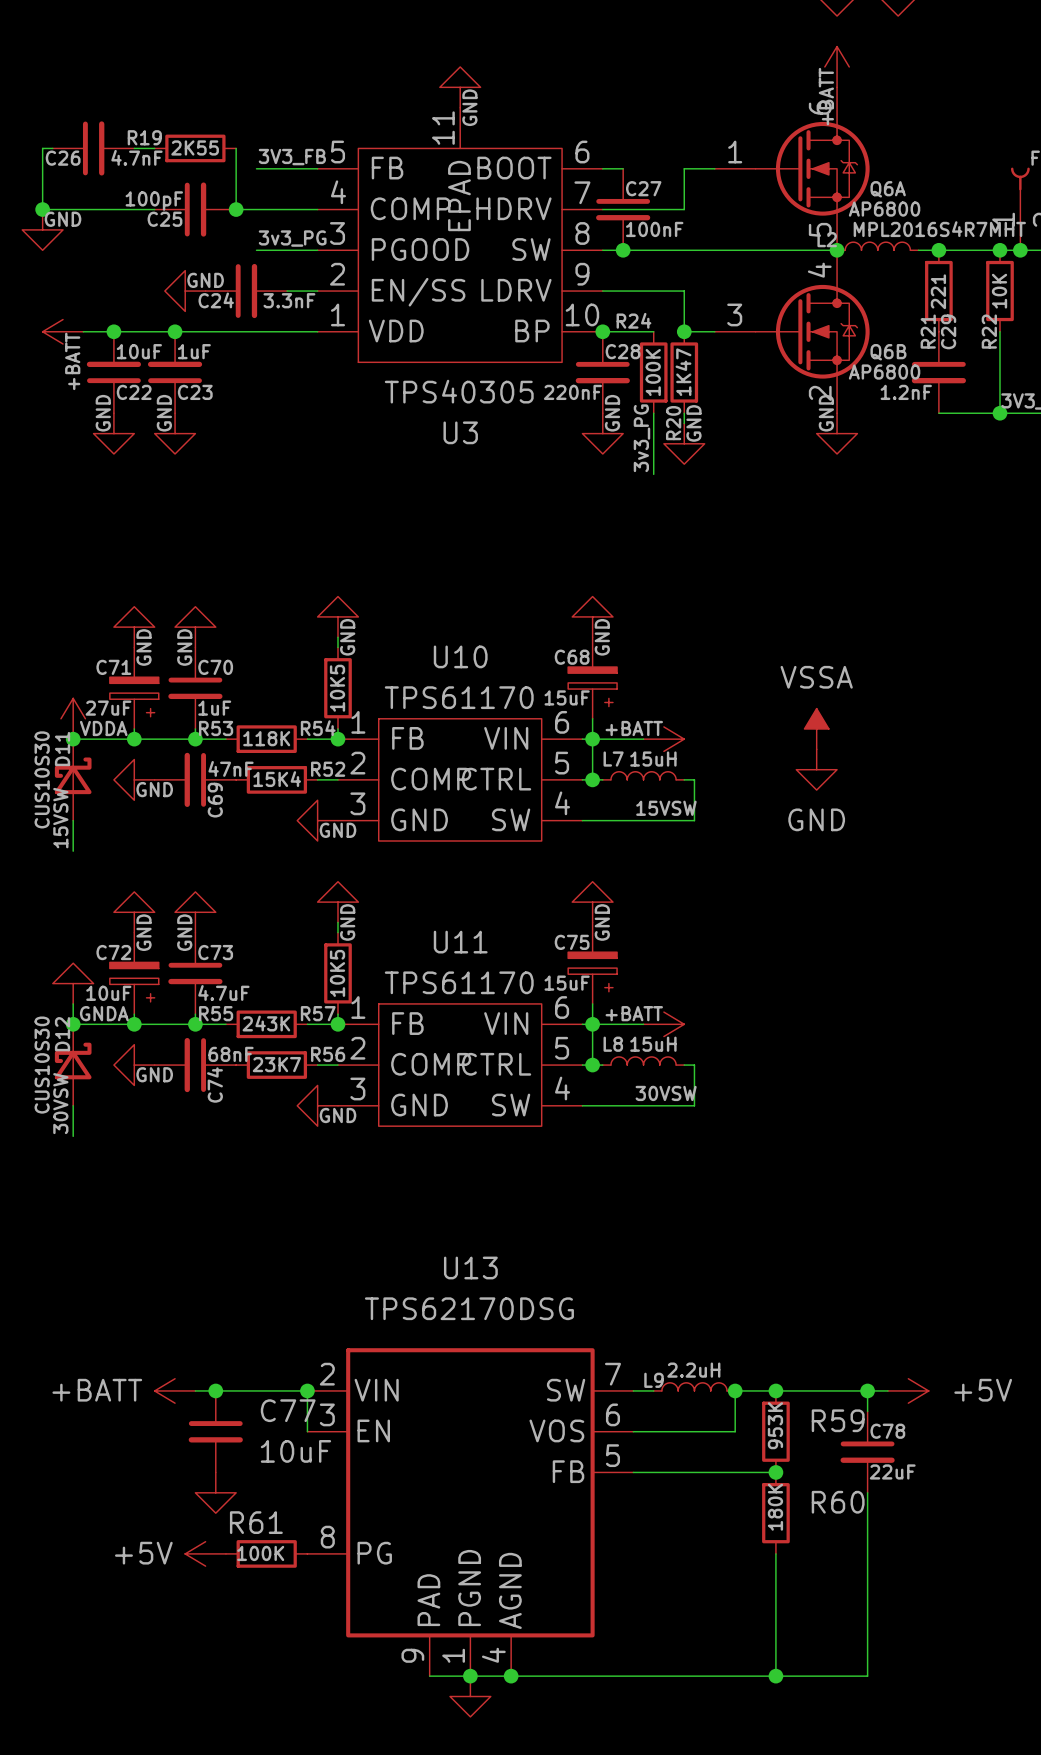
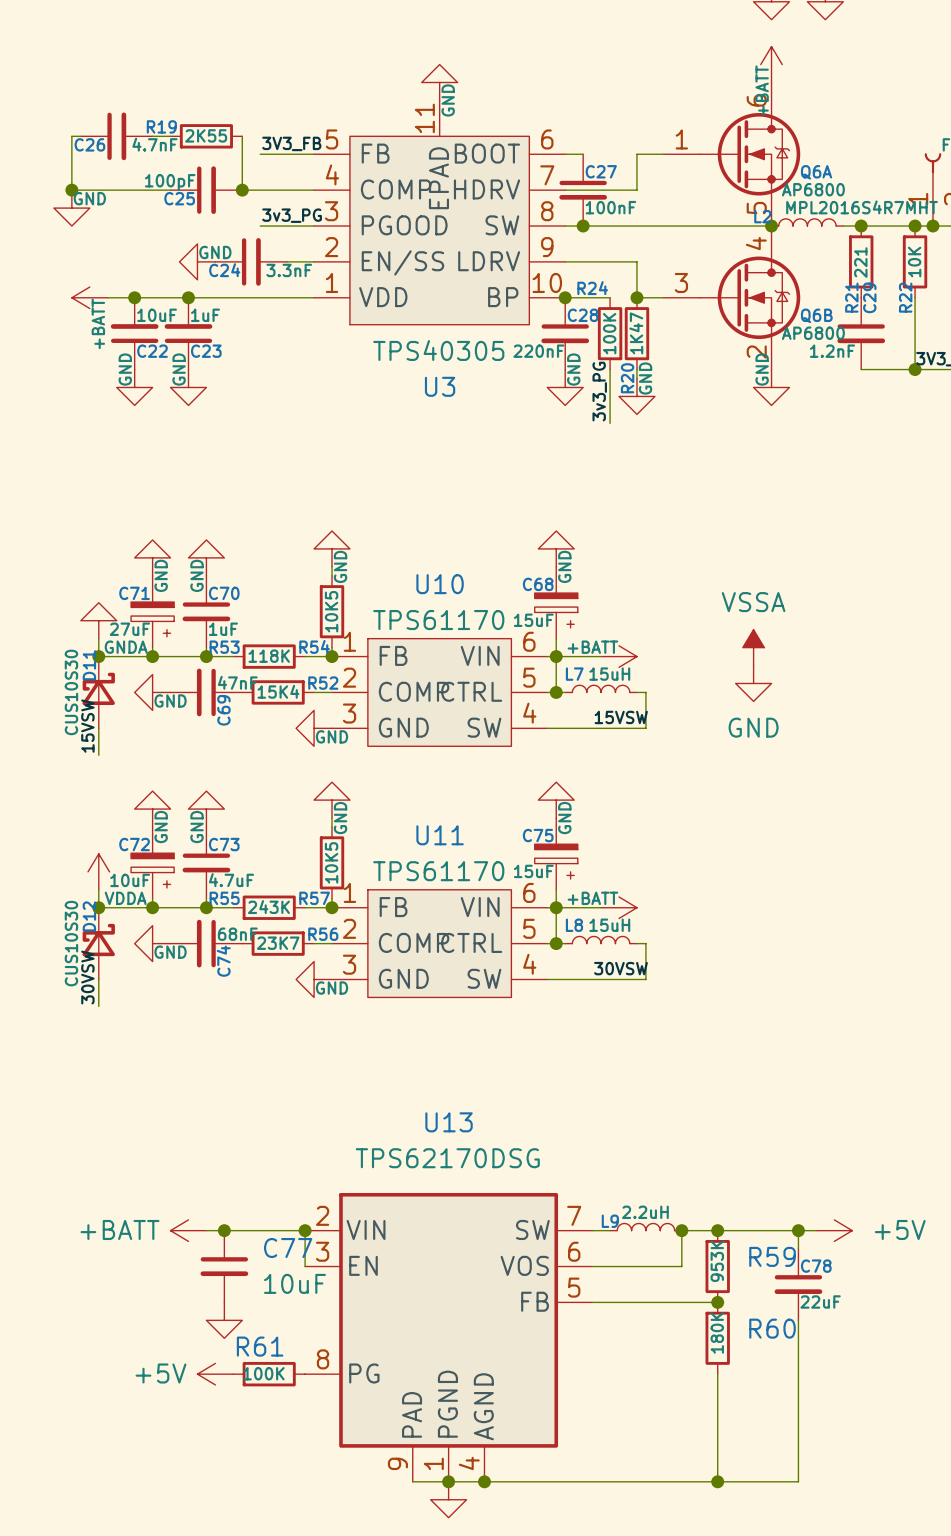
power symbol: none -> GNDA (98, 620)
power symbol: VDDA (73, 718) -> none
power symbol: GNDA (73, 983) -> VDDA (98, 871)

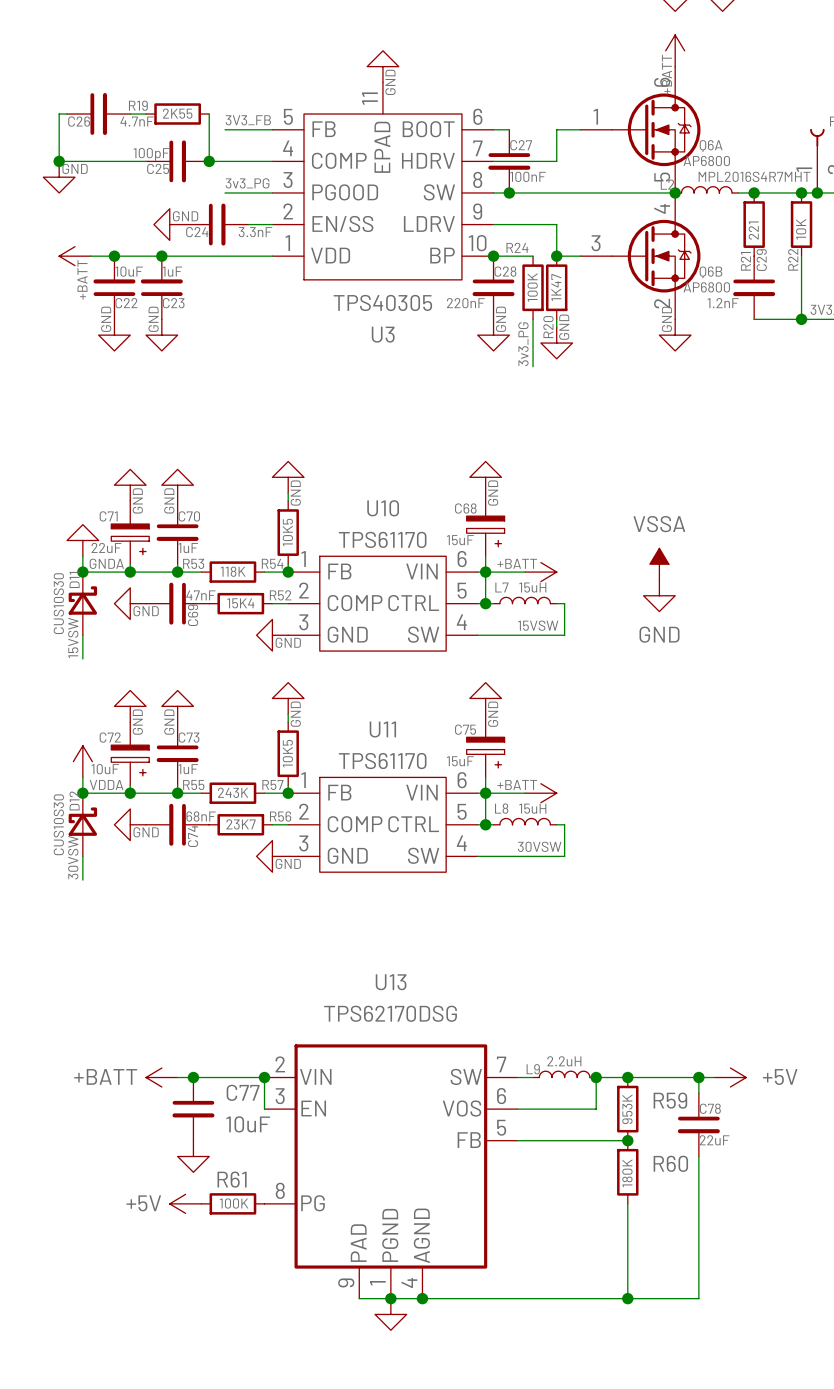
C71 value: 27uF (129, 629) -> 22uF (106, 548)
C73 value: 4.7uF (231, 880) -> 1uF (188, 769)

